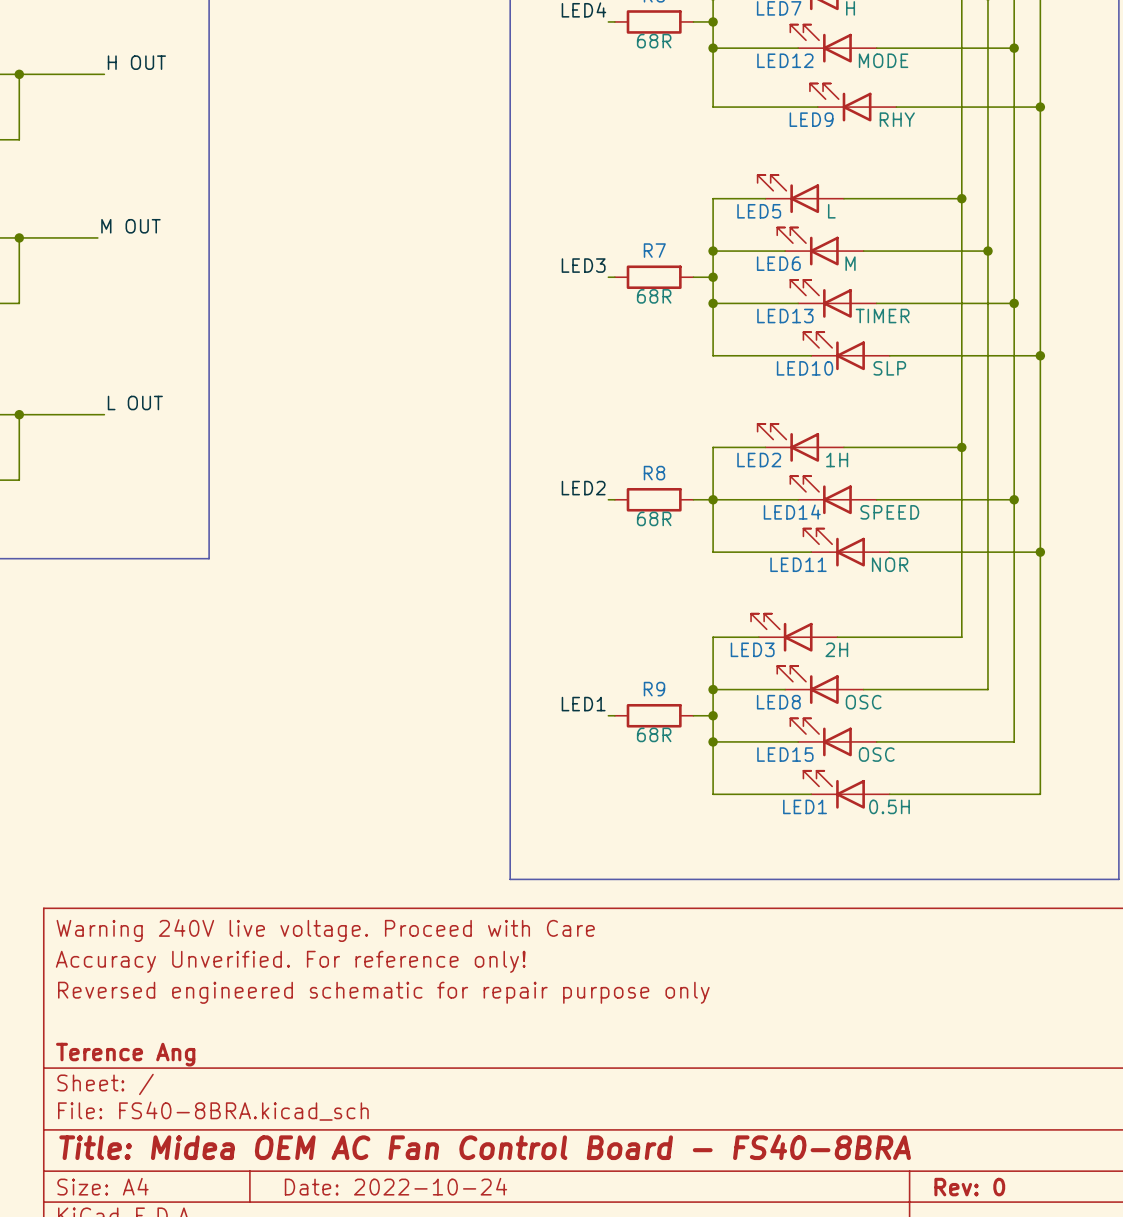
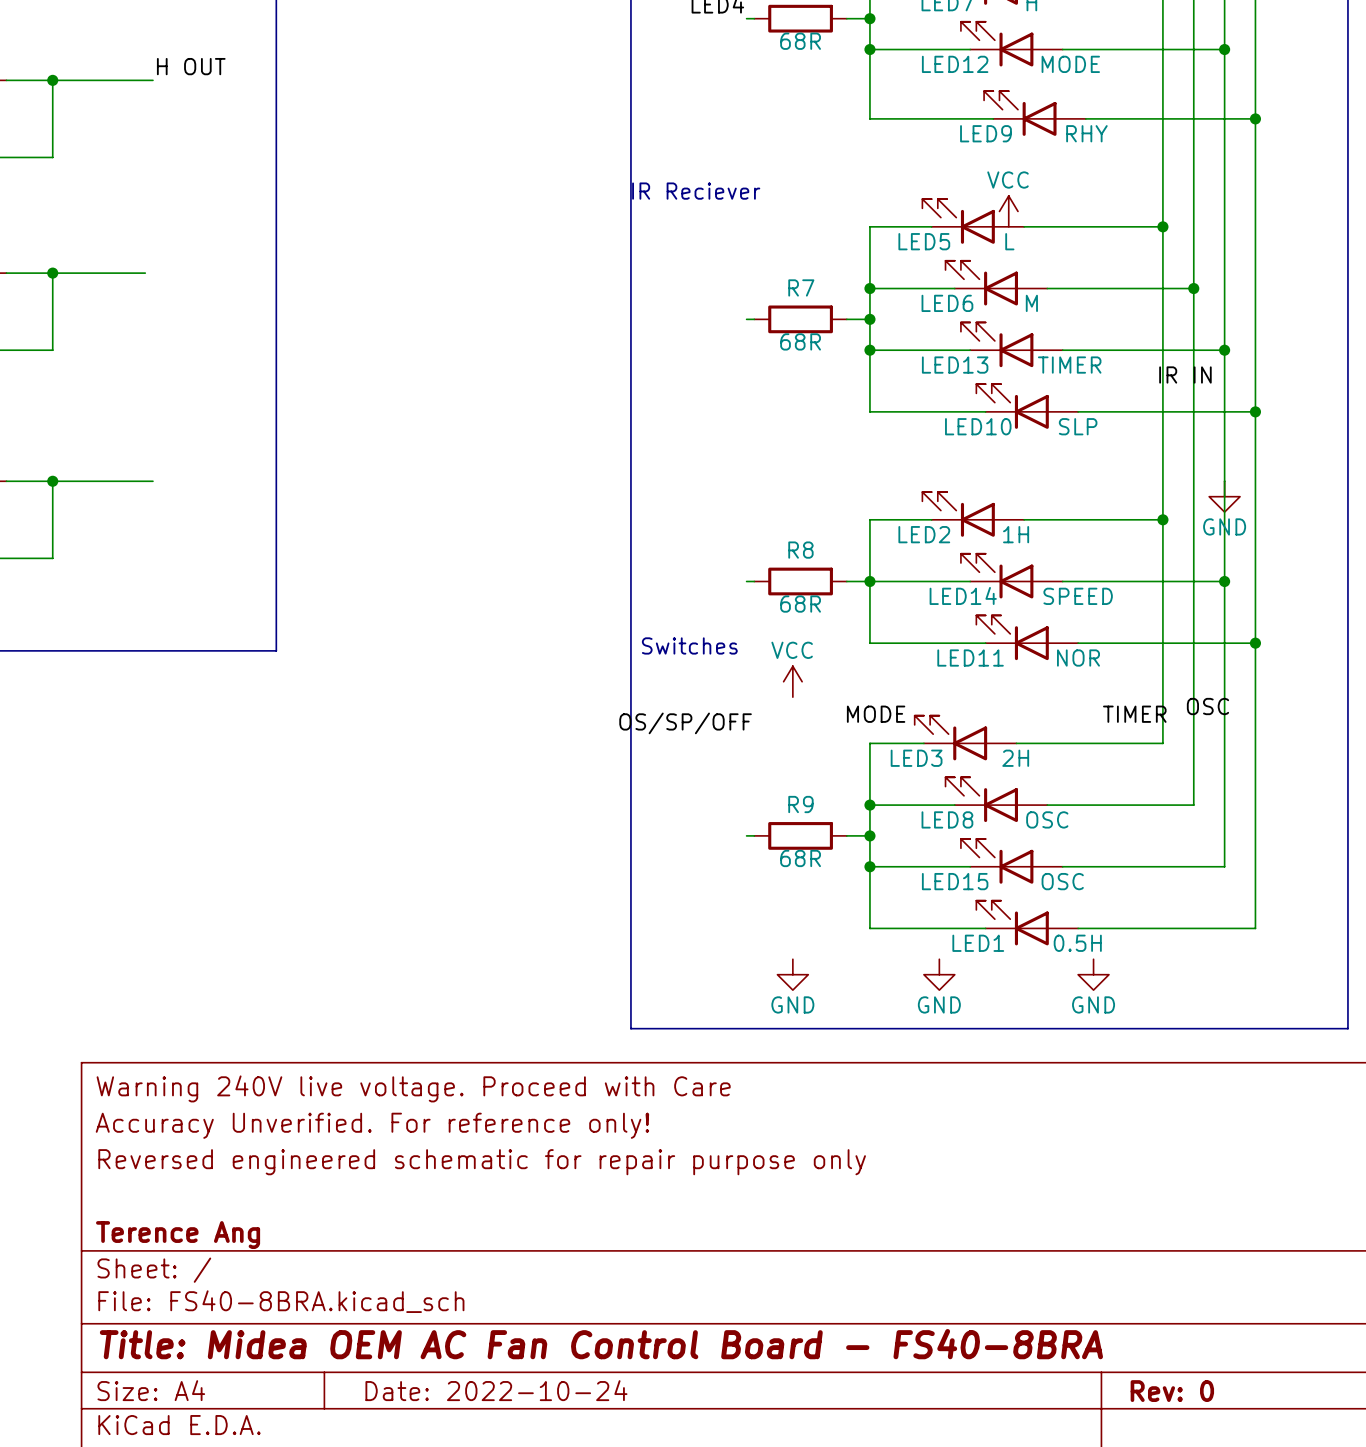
text: none -> IR Reciever (696, 191)
power symbol: none -> VCC (1008, 211)
label: M OUT (130, 226) -> none
label: LED3 (583, 265) -> none
label: none -> IR IN (1185, 374)
label: L OUT (135, 403) -> none
power symbol: none -> GND (1224, 496)
label: LED2 (583, 488) -> none
text: none -> Switches (689, 645)
power symbol: none -> VCC (792, 681)
label: none -> OSC (1207, 706)
label: none -> MODE (876, 714)
label: none -> TIMER (1134, 714)
label: none -> OS/SP/OFF (685, 723)
label: LED1 (583, 704) -> none
power symbol: none -> GND (792, 974)
power symbol: none -> GND (939, 974)
power symbol: none -> GND (1093, 974)

